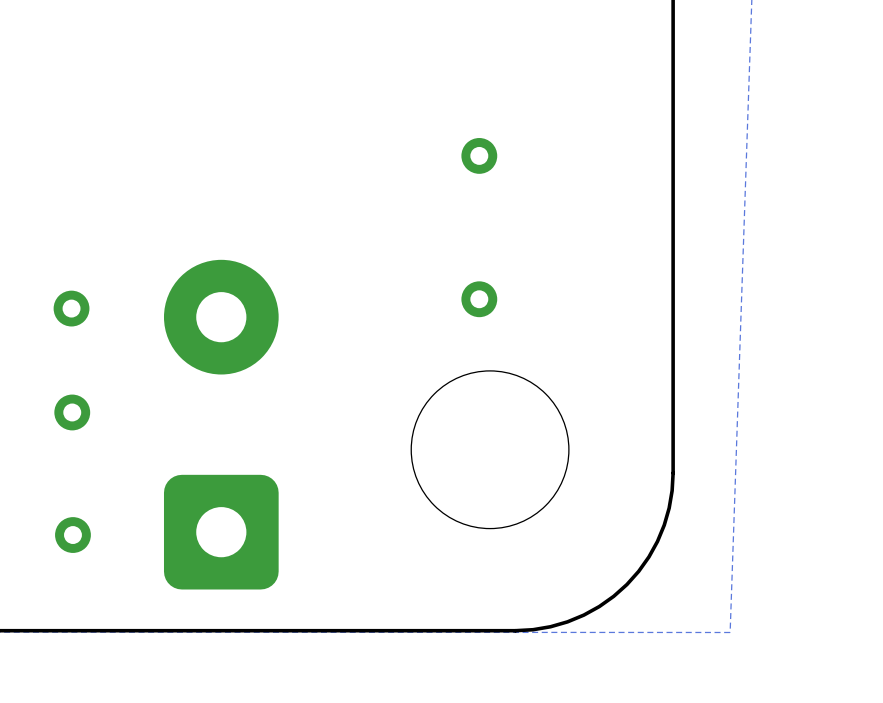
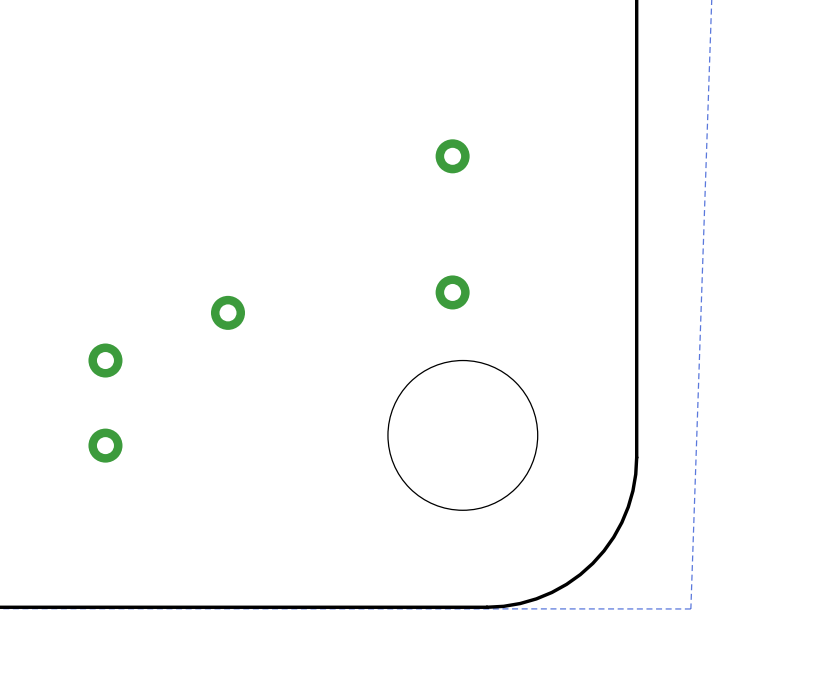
via: (71, 308) -> none
via: none -> (227, 312)
via: none -> (105, 360)
via: (72, 412) -> none
part: (221, 424) -> none
via: none -> (105, 445)
via: (72, 535) -> none

